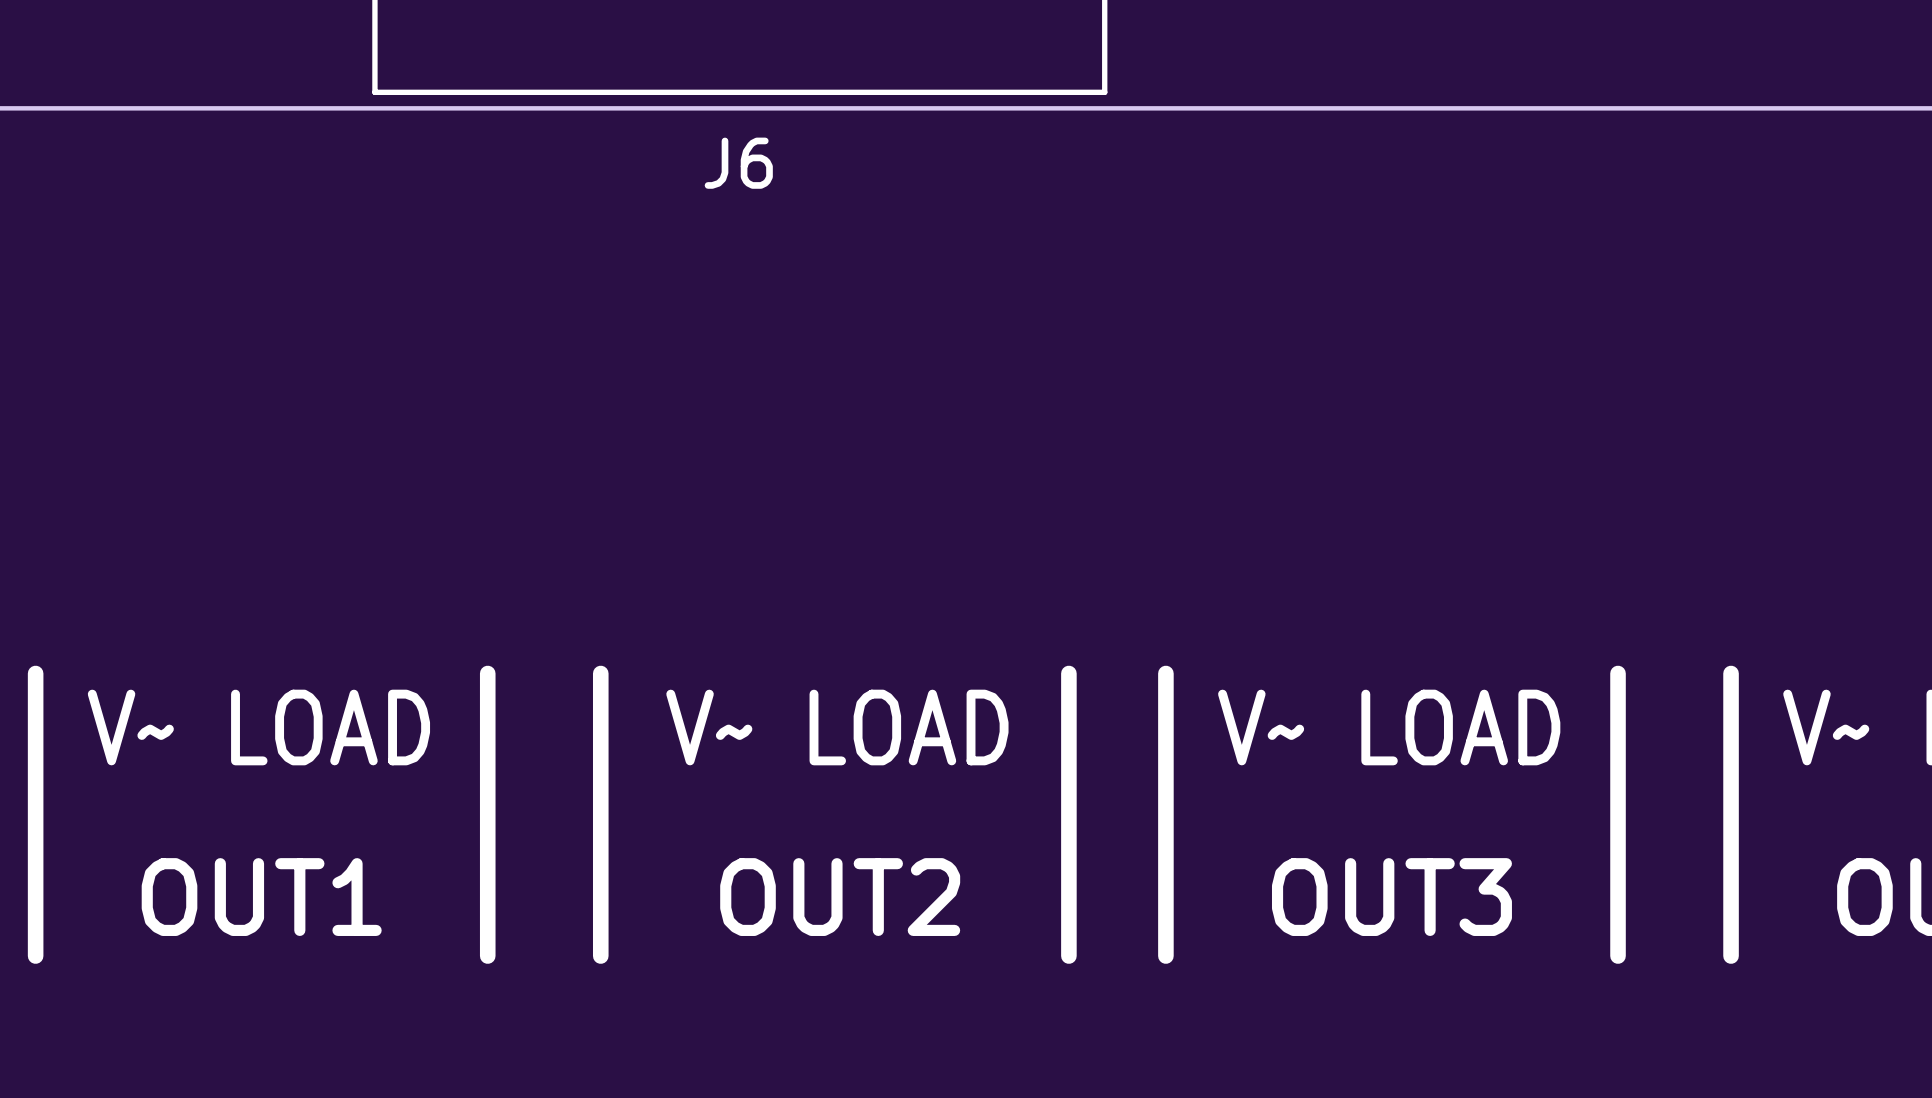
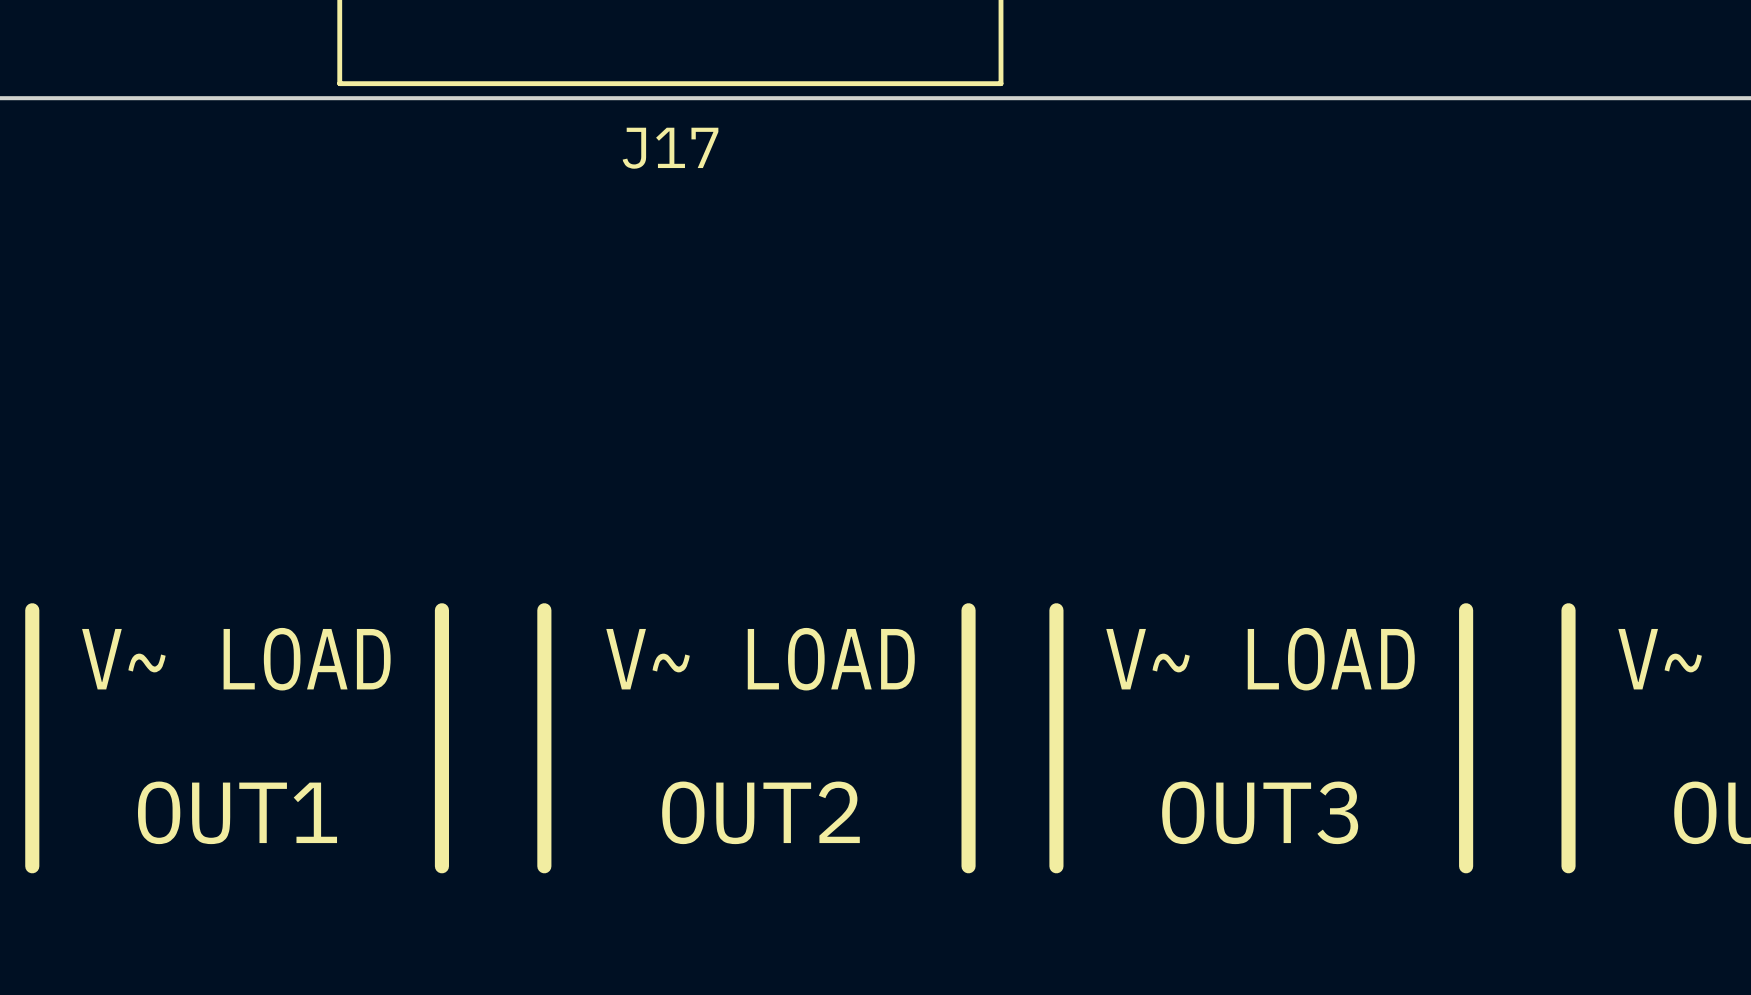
J6 name: J6 (738, 163) -> J17 (670, 148)

